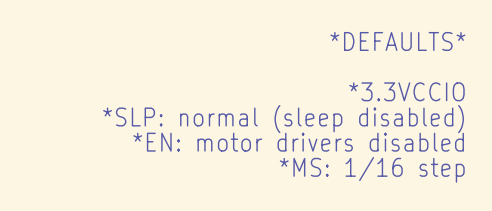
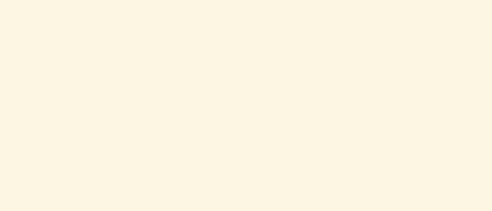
text: *DEFAULTS* (397, 41) -> none
text: *3.3VCCIO (406, 91) -> none
text: *SLP: normal (sleep disabled) (283, 119) -> none
text: *EN: motor drivers disabled (298, 142) -> none
text: *MS: 1/16 step (372, 169) -> none

